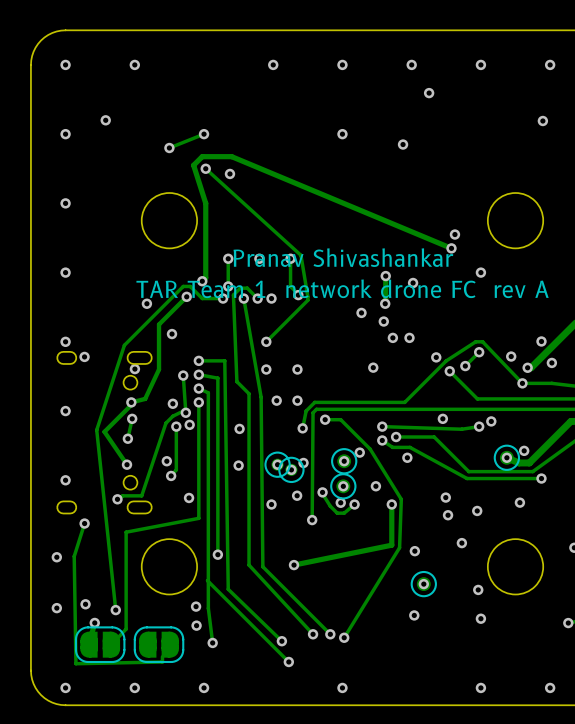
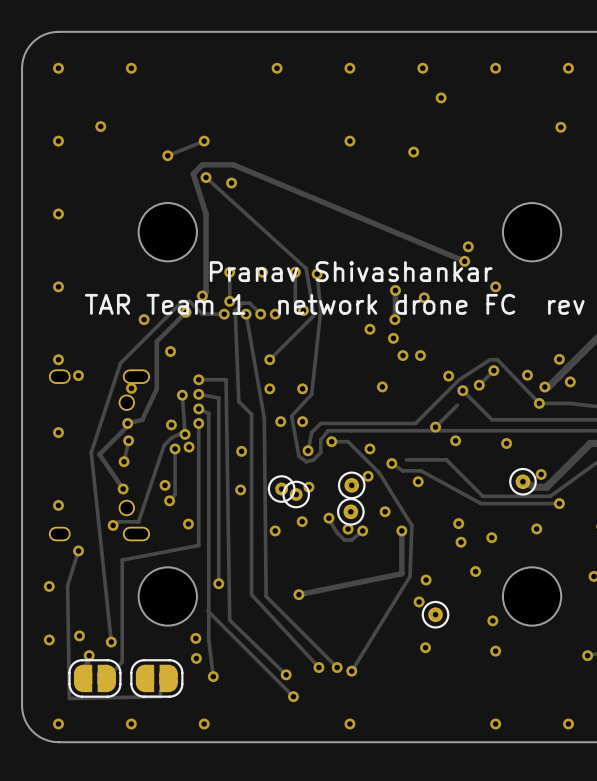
via: none -> (317, 274)
track: none -> (457, 405) (435, 427)
via: none -> (435, 427)
track: (321, 409) (316, 409) (313, 412) (312, 520) -> (328, 430) (320, 439) (320, 452) (313, 459) (306, 461) (298, 456) (291, 416) (311, 394) (320, 310) (317, 274)
via: none -> (369, 448)
via: (382, 426) -> none
track: (479, 426) (461, 429) (382, 426) -> none
via: (479, 426) -> none
via: (396, 437) -> none
via: (312, 520) -> none
via: none -> (419, 601)

